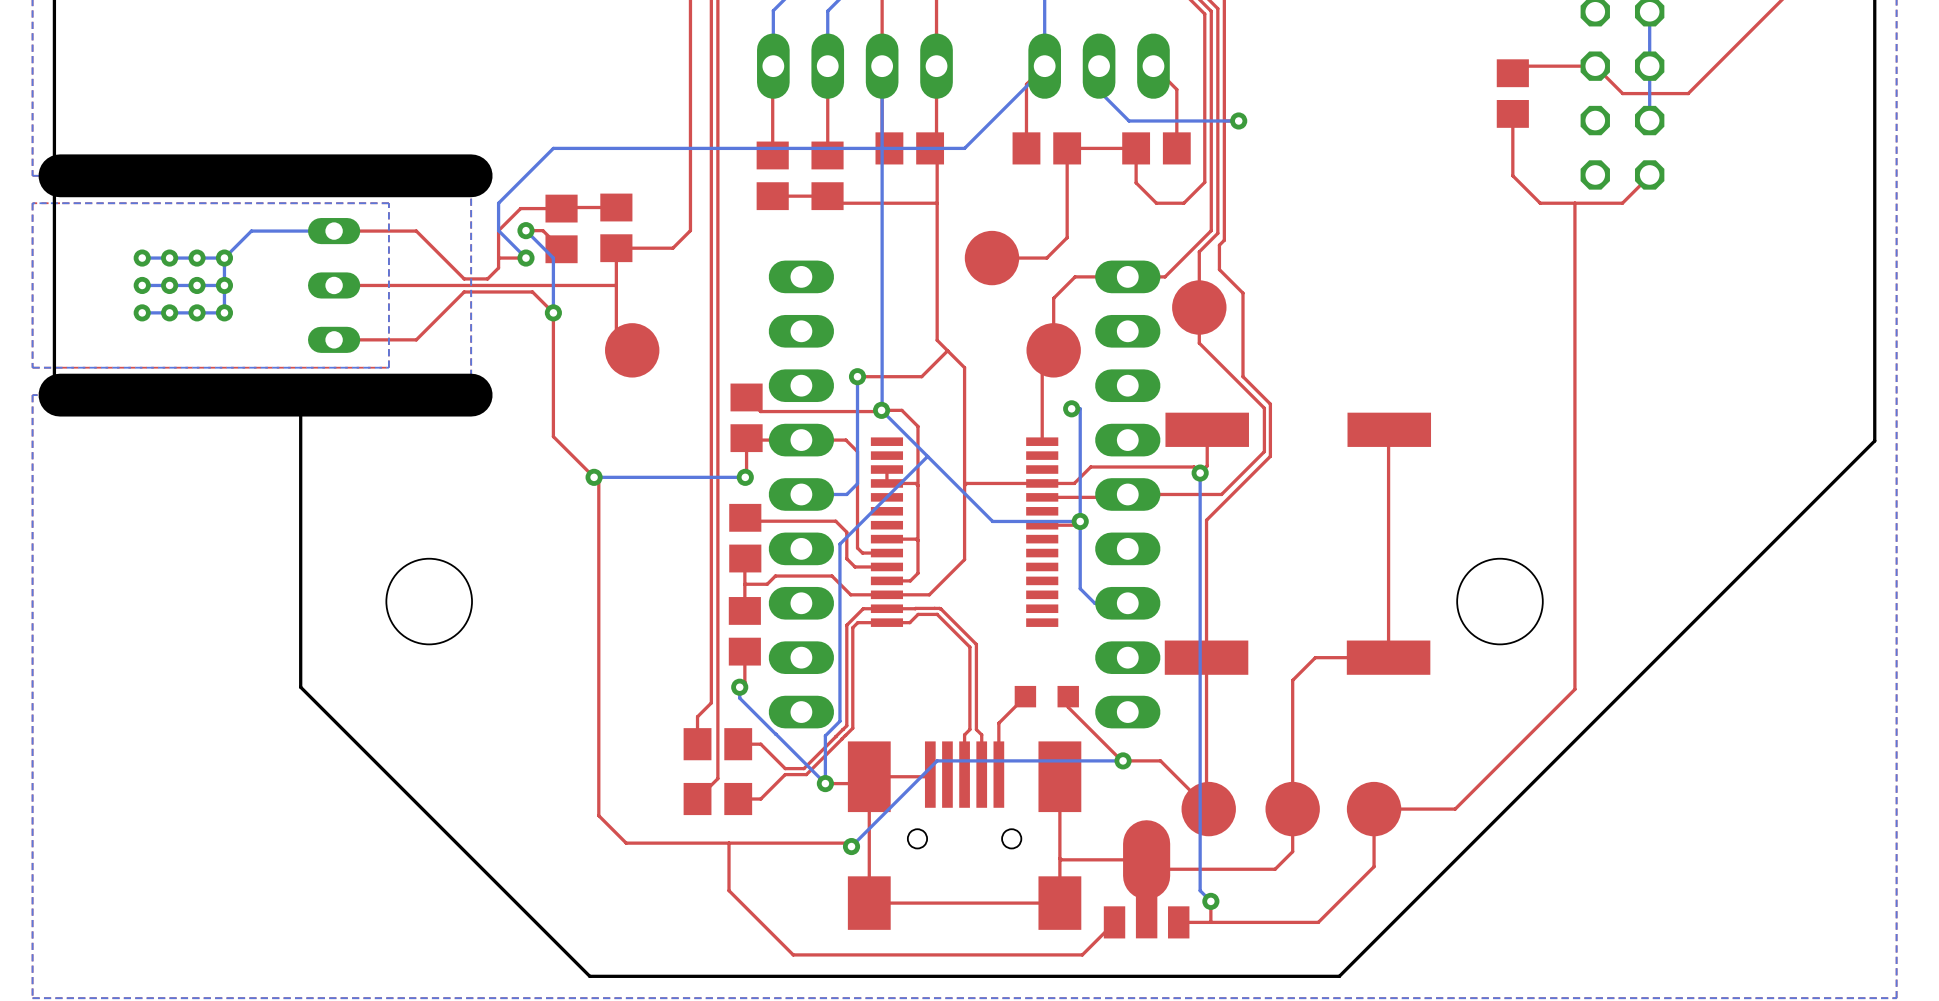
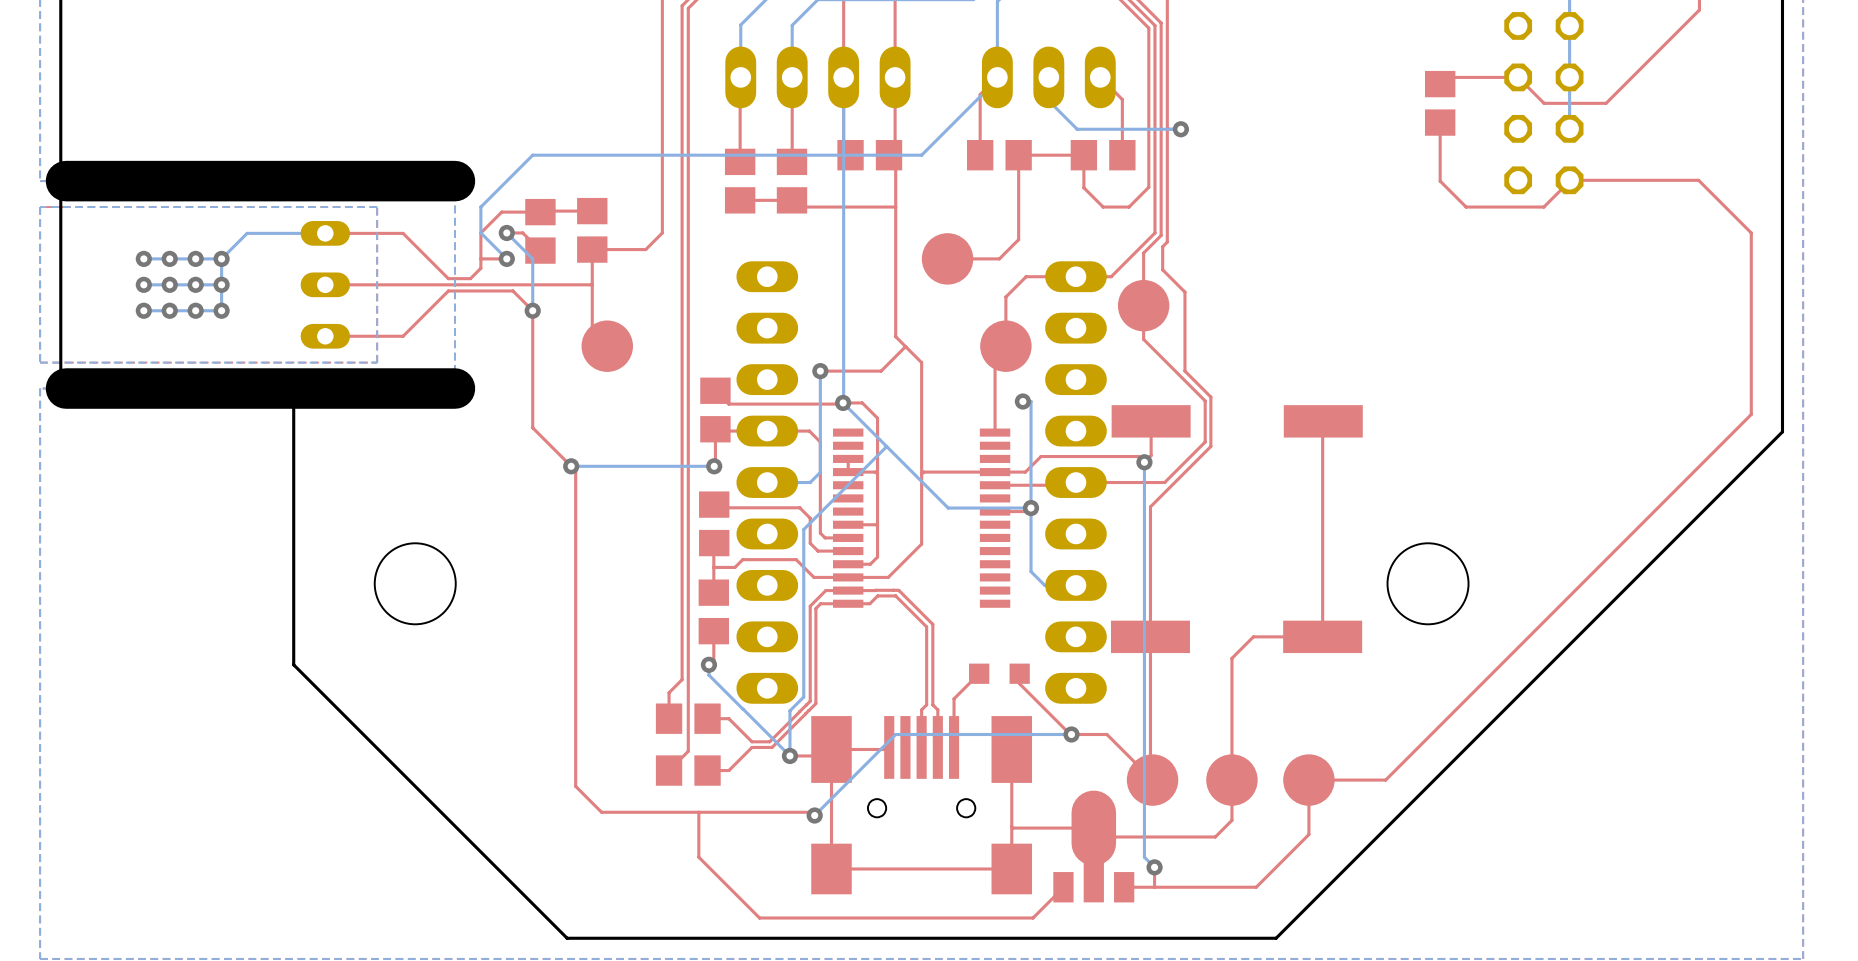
top track: (1574, 203) (1574, 689) -> (1569, 180) (1698, 180) (1751, 232) (1751, 414) (1498, 666)

